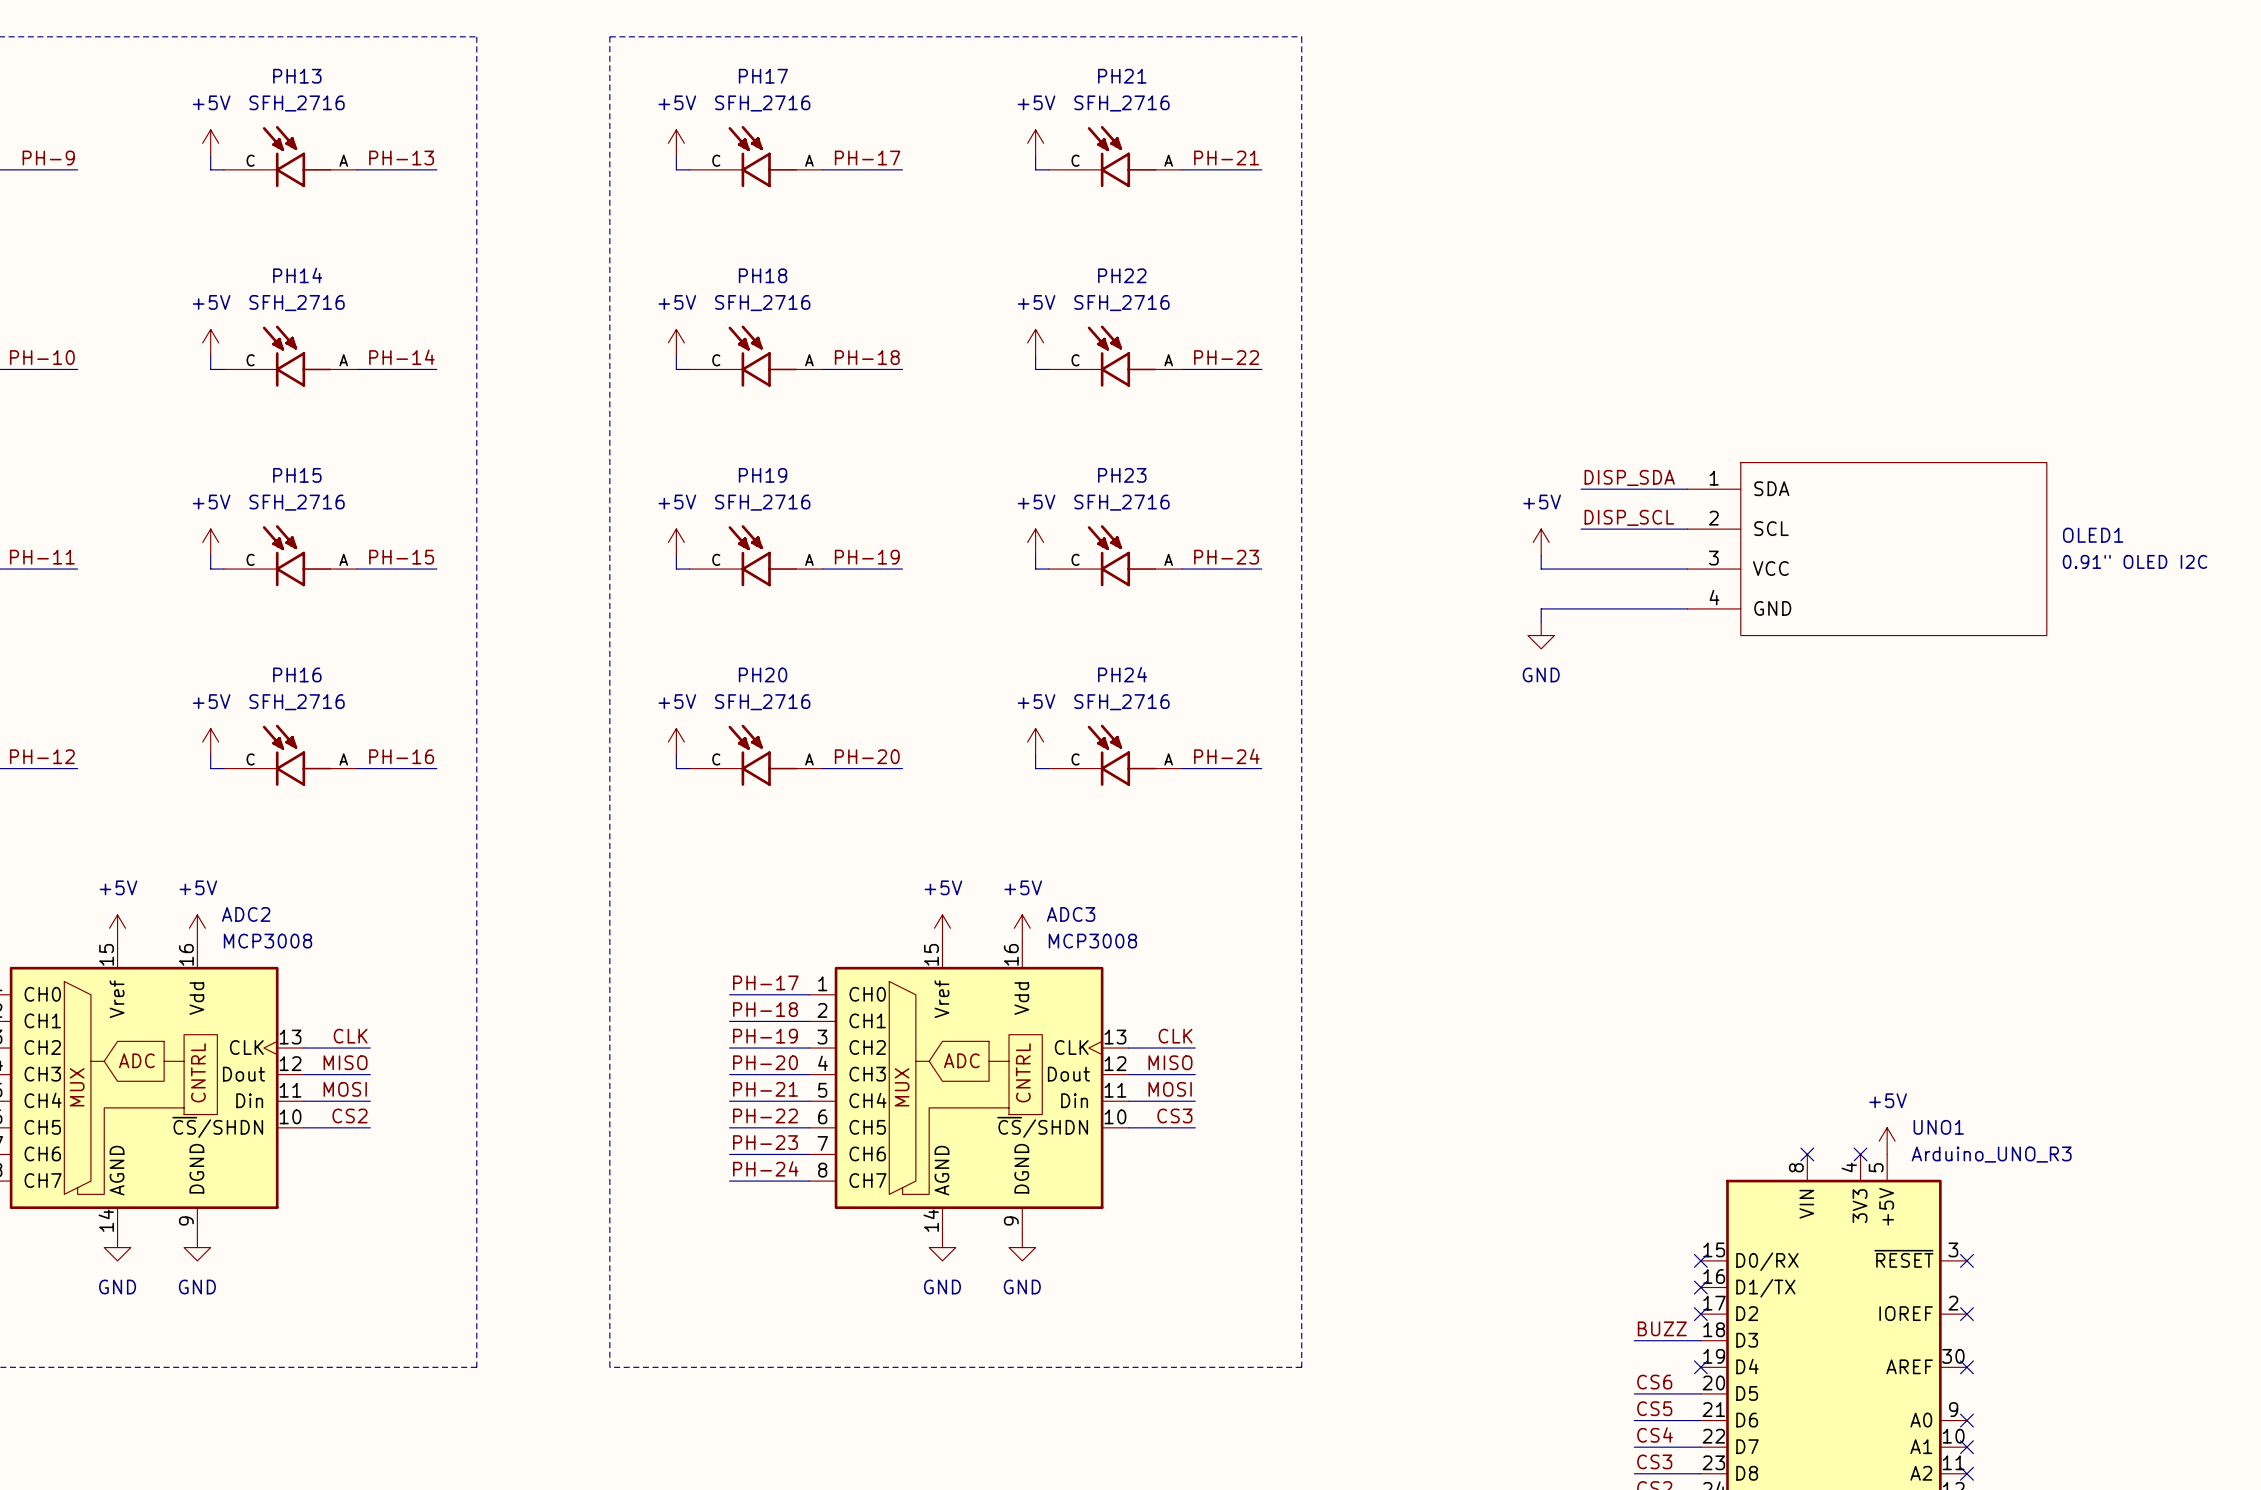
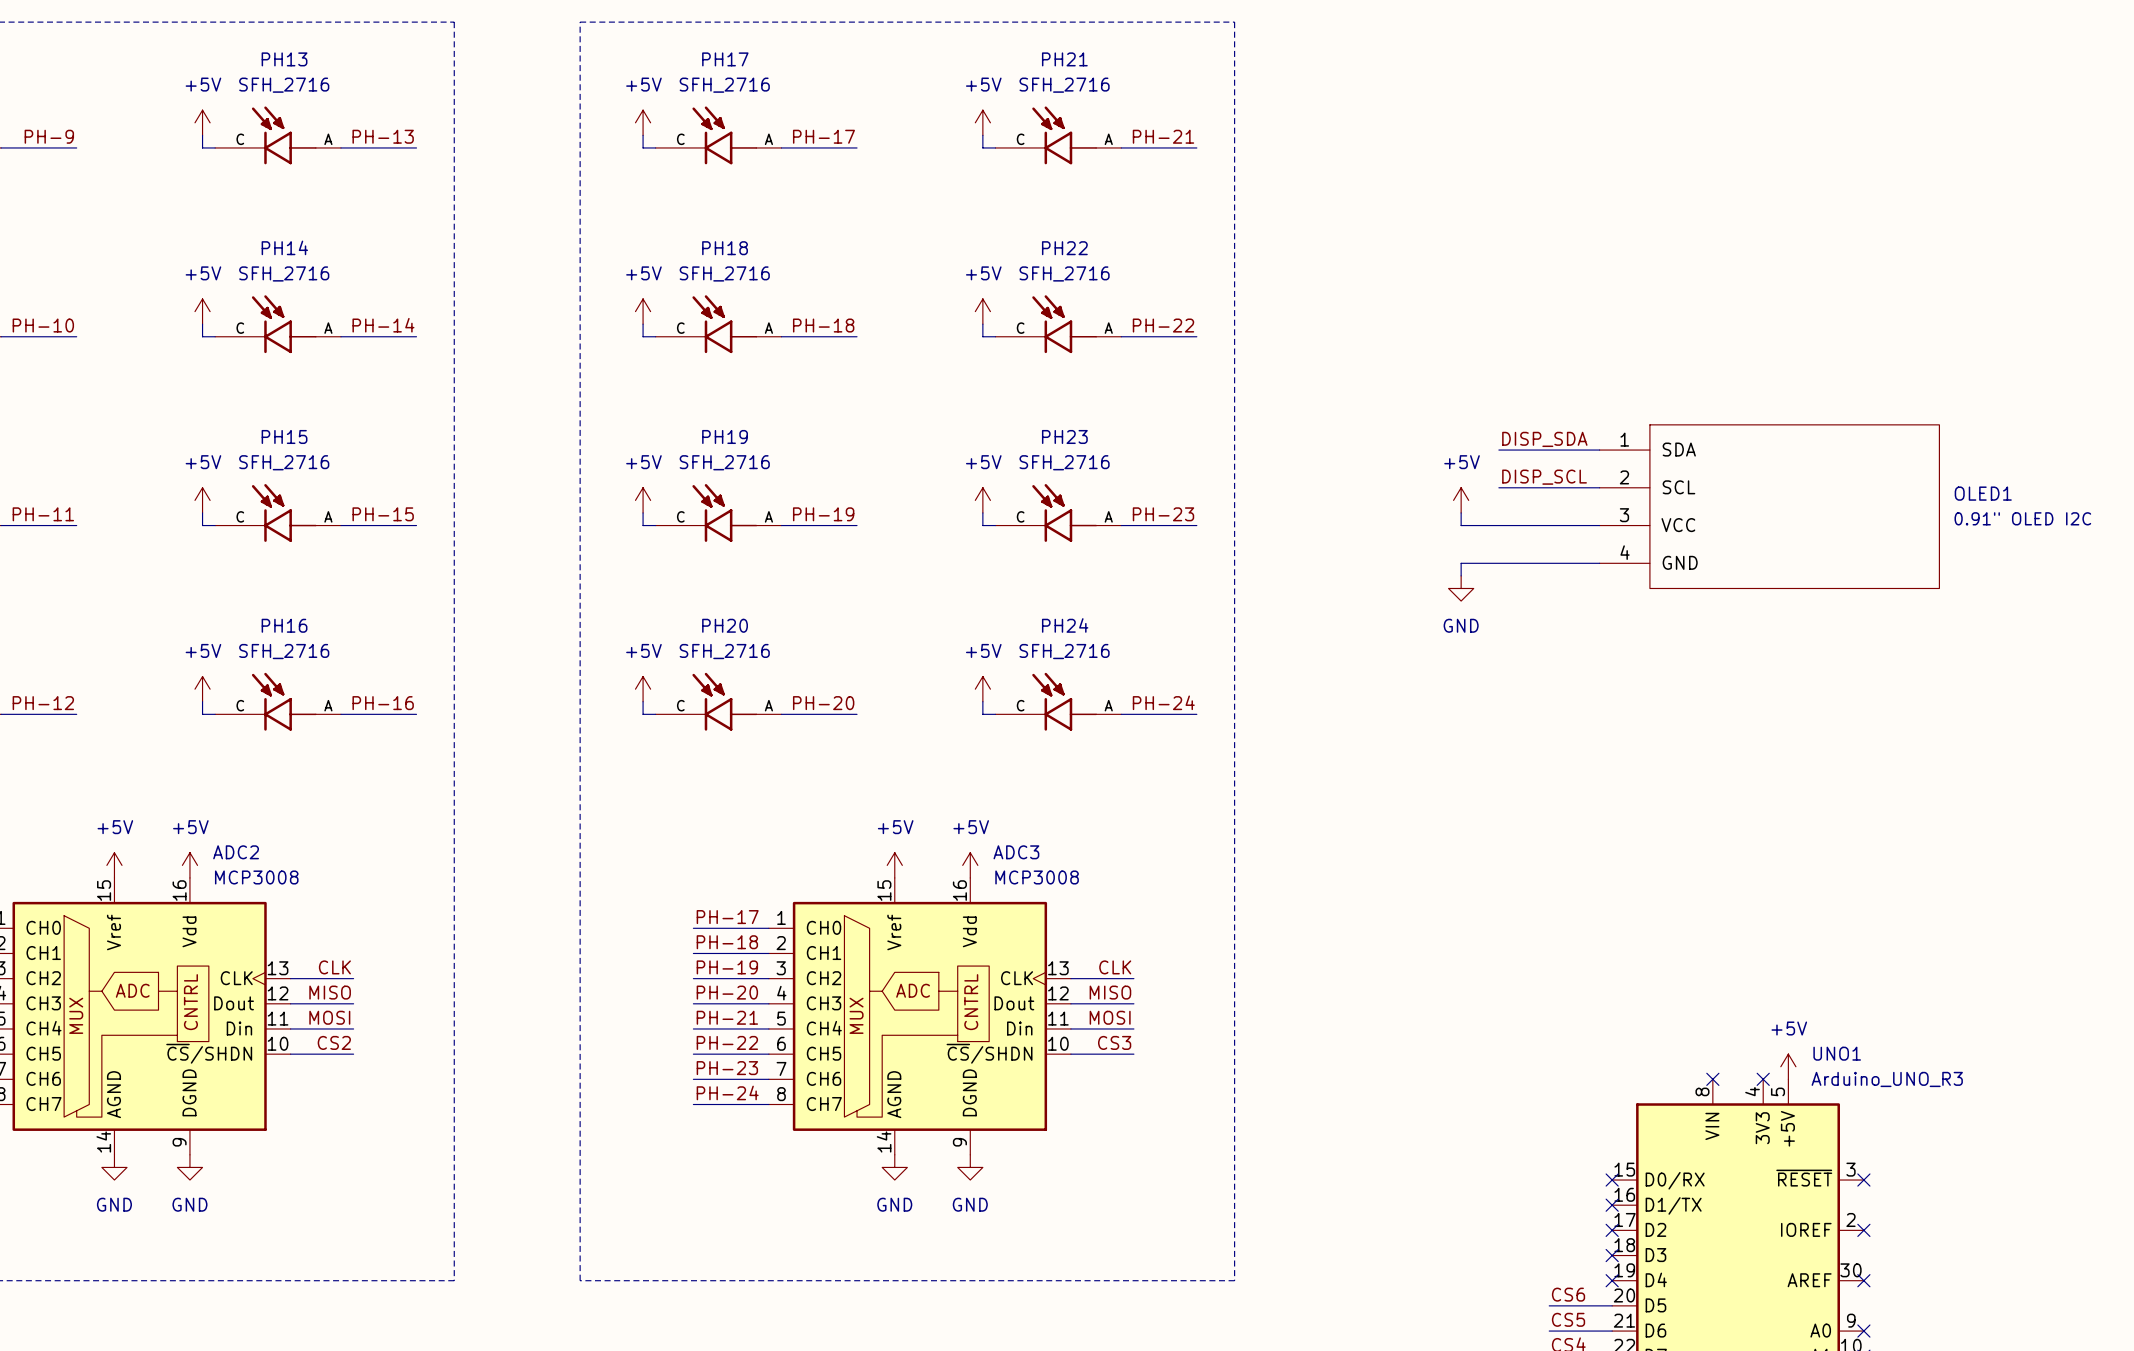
label: BUZZ (1662, 1328) -> none
wire: (1634, 1340) (1700, 1340) -> none
no-connect mark: none -> (1612, 1255)

